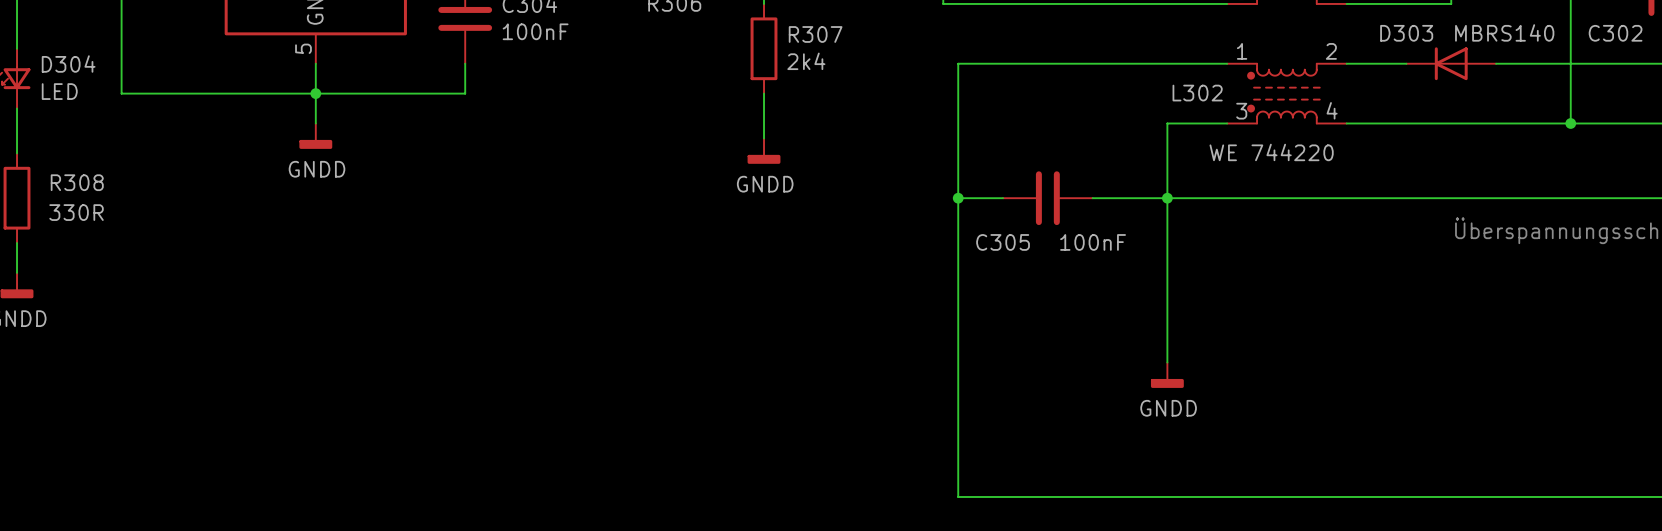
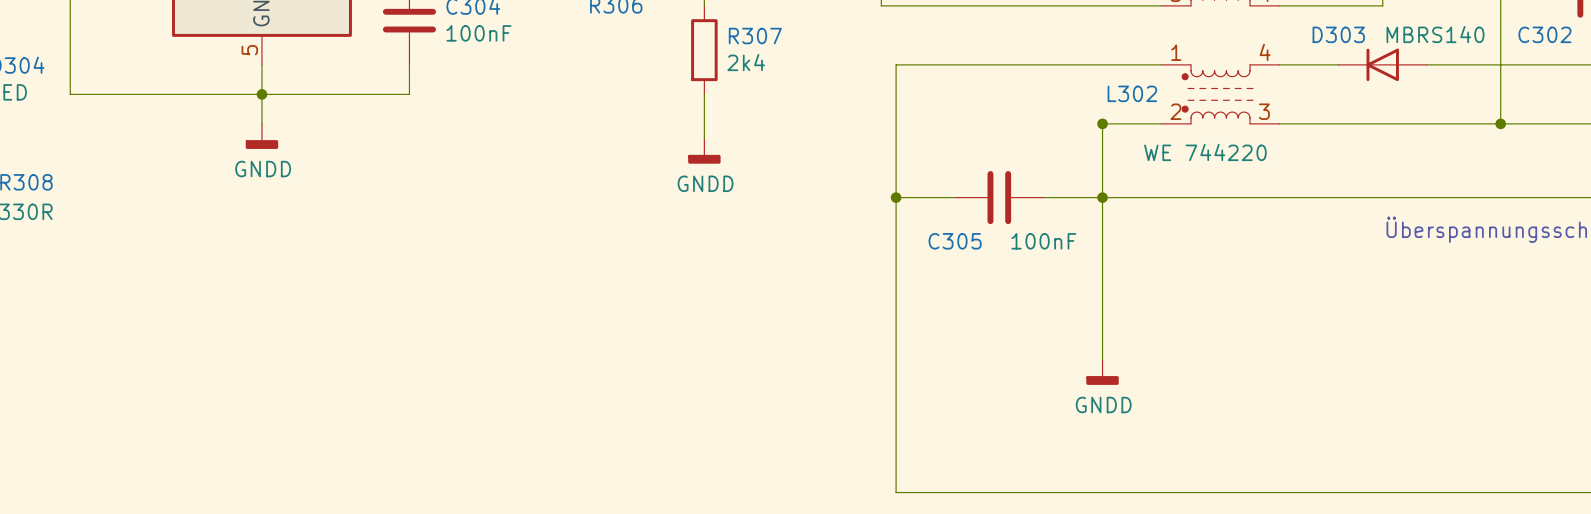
L302 pin number: 2 (1331, 51) -> 4 (1265, 52)
L302 pin number: 4 (1332, 110) -> 3 (1264, 111)
L302 pin number: 3 (1241, 111) -> 2 (1175, 111)
junction: none -> (1102, 123)
C305 position: (1047, 198) -> (999, 197)

